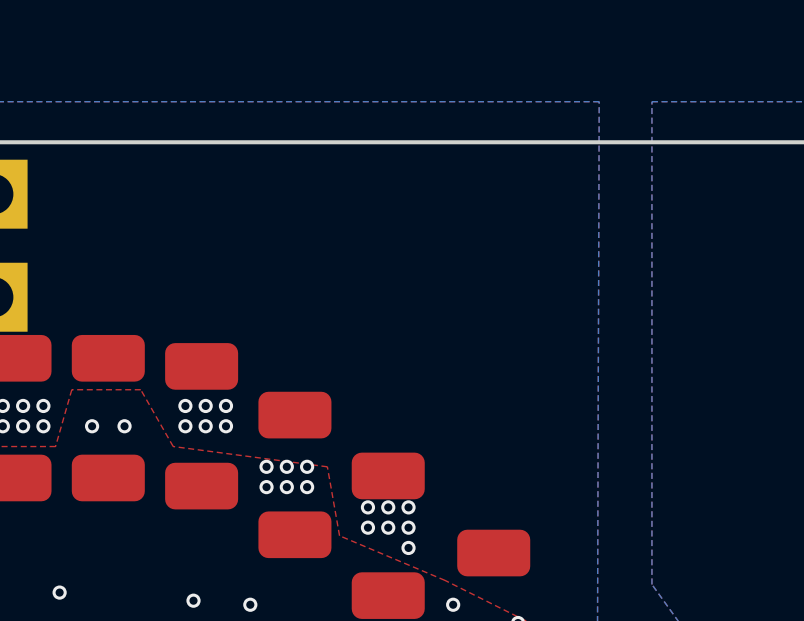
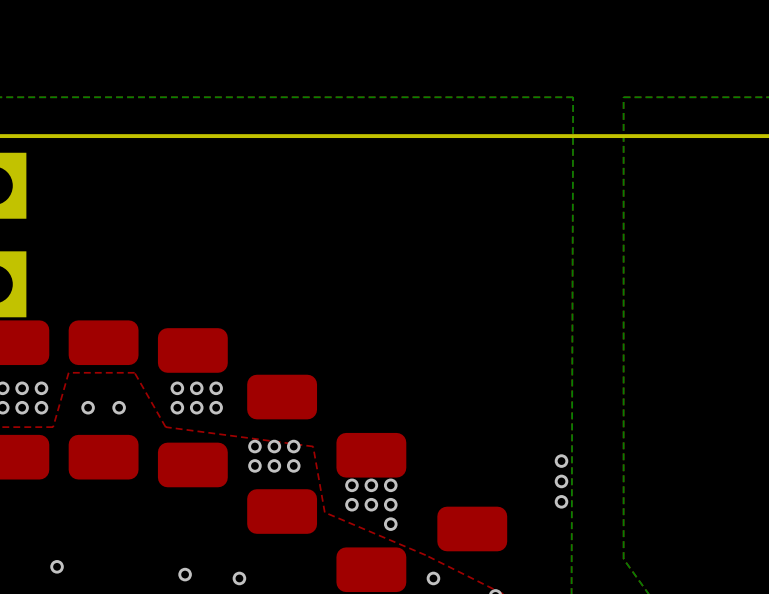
via: none -> (561, 461)
via: none -> (561, 481)
via: none -> (561, 501)

